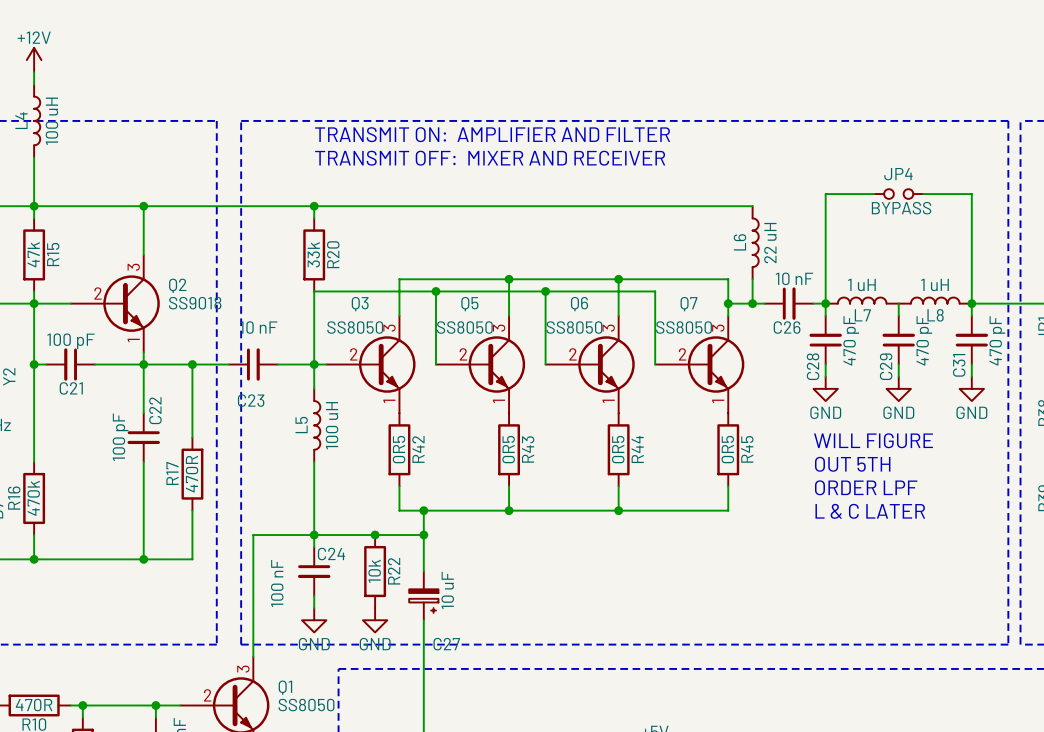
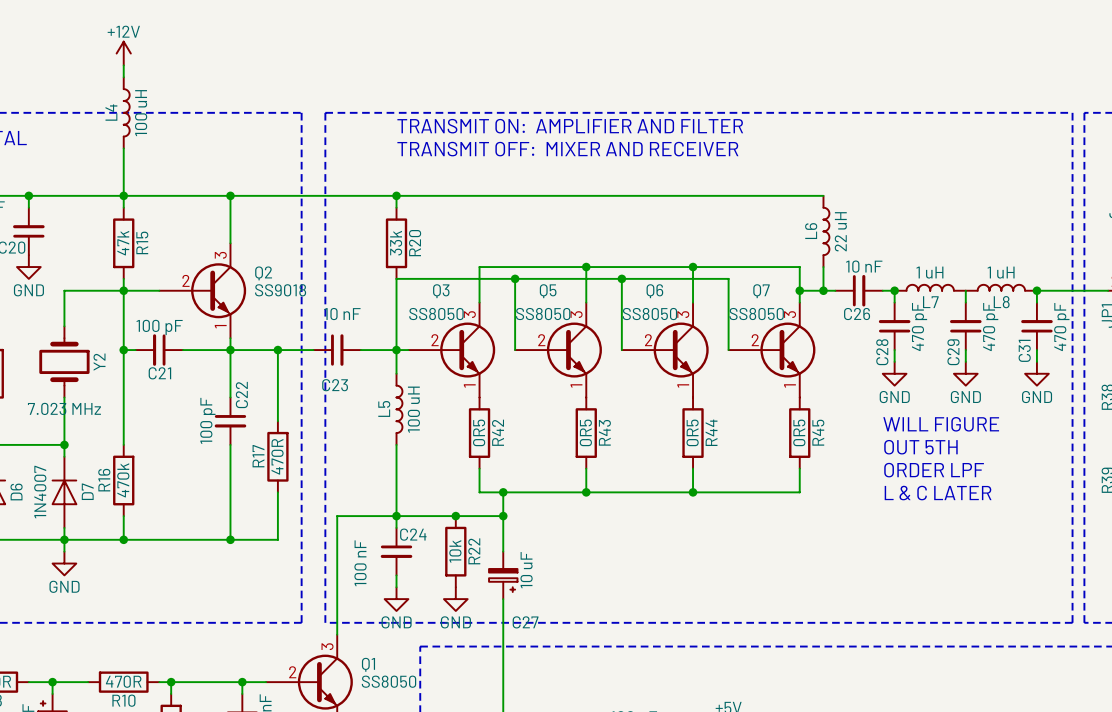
wire: (874, 194) (825, 194) (825, 303) -> none
JP4: BYPASS (898, 194) -> none
wire: (923, 194) (971, 194) (971, 303) -> none

